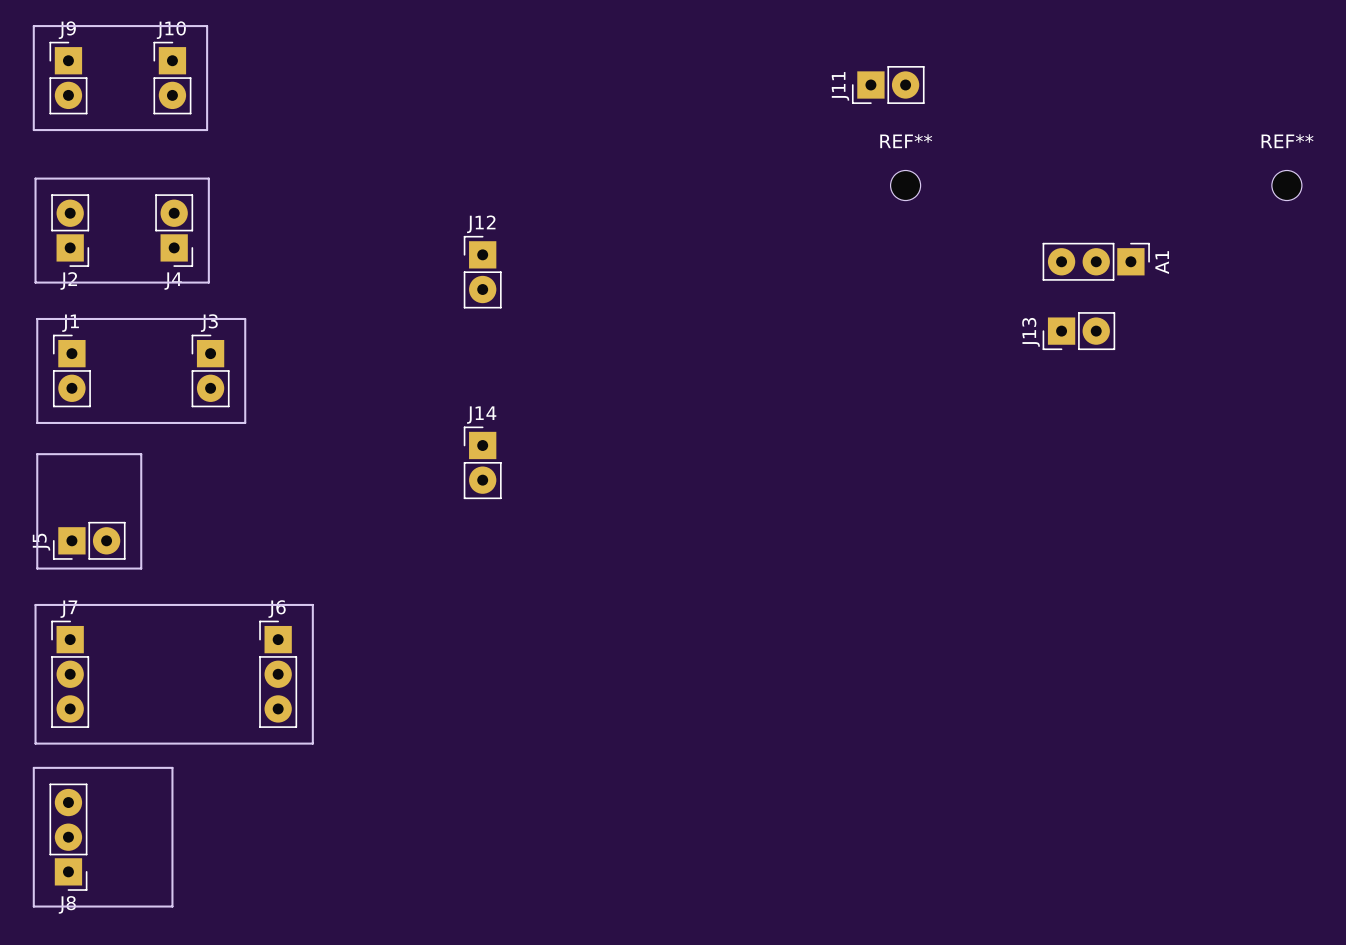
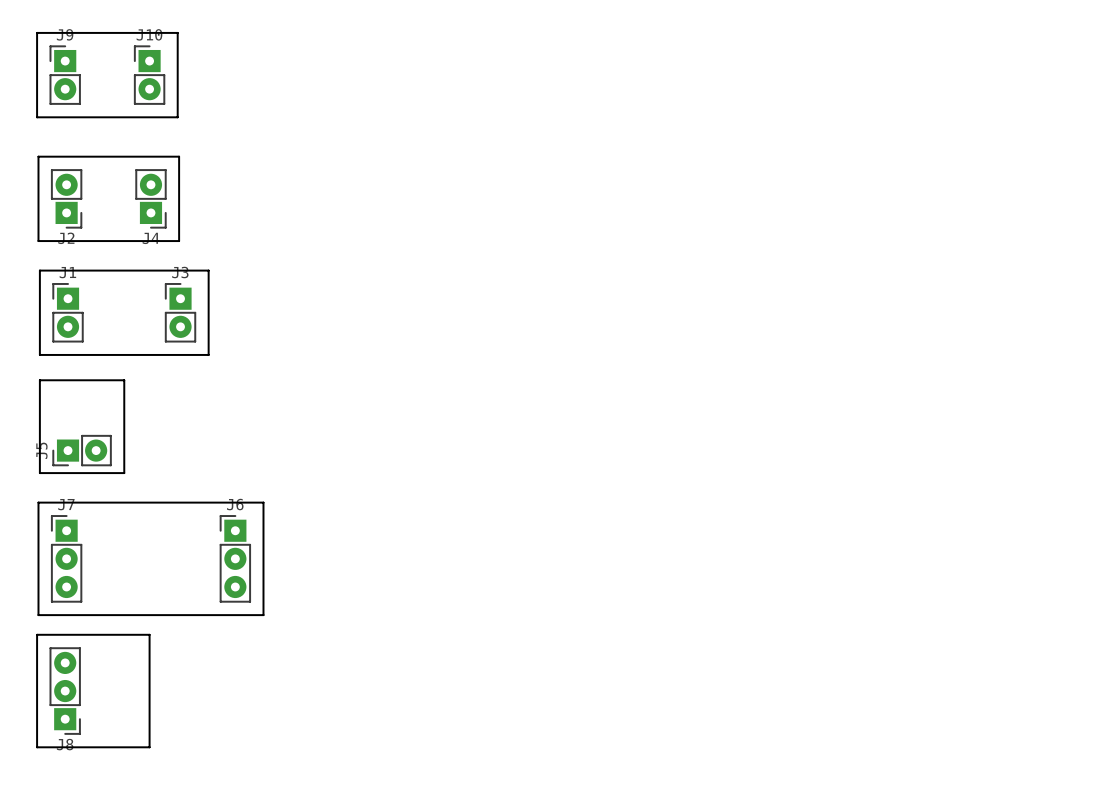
J11: (888, 84) -> none
REF**: (905, 185) -> none
REF**: (1286, 185) -> none
A1: (1096, 261) -> none
J12: (482, 272) -> none
J13: (1078, 331) -> none
J14: (482, 462) -> none

